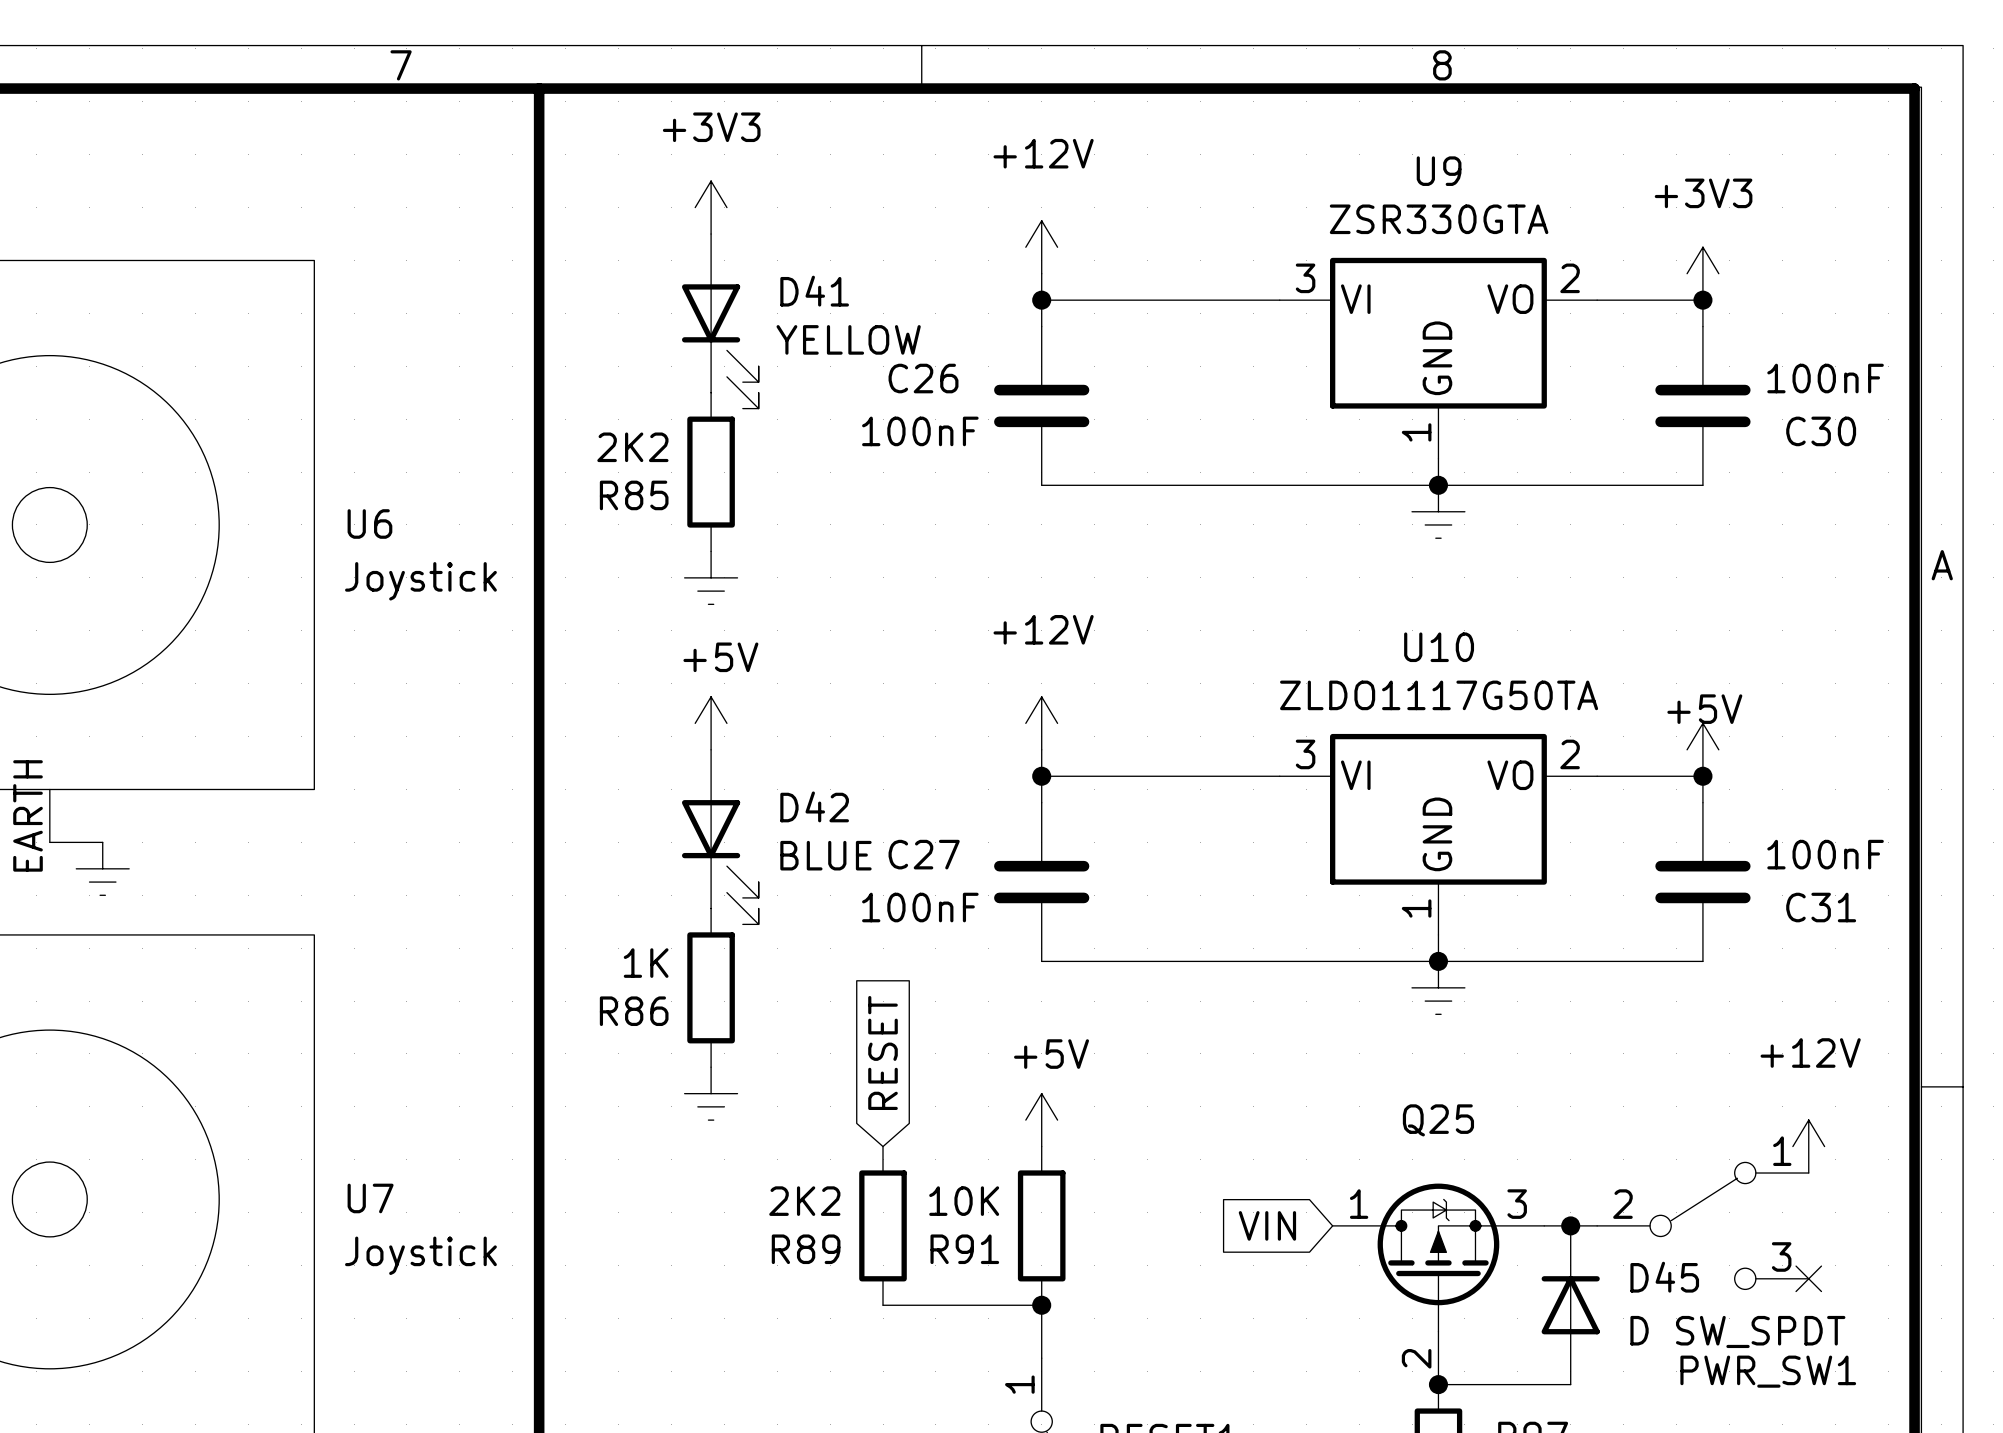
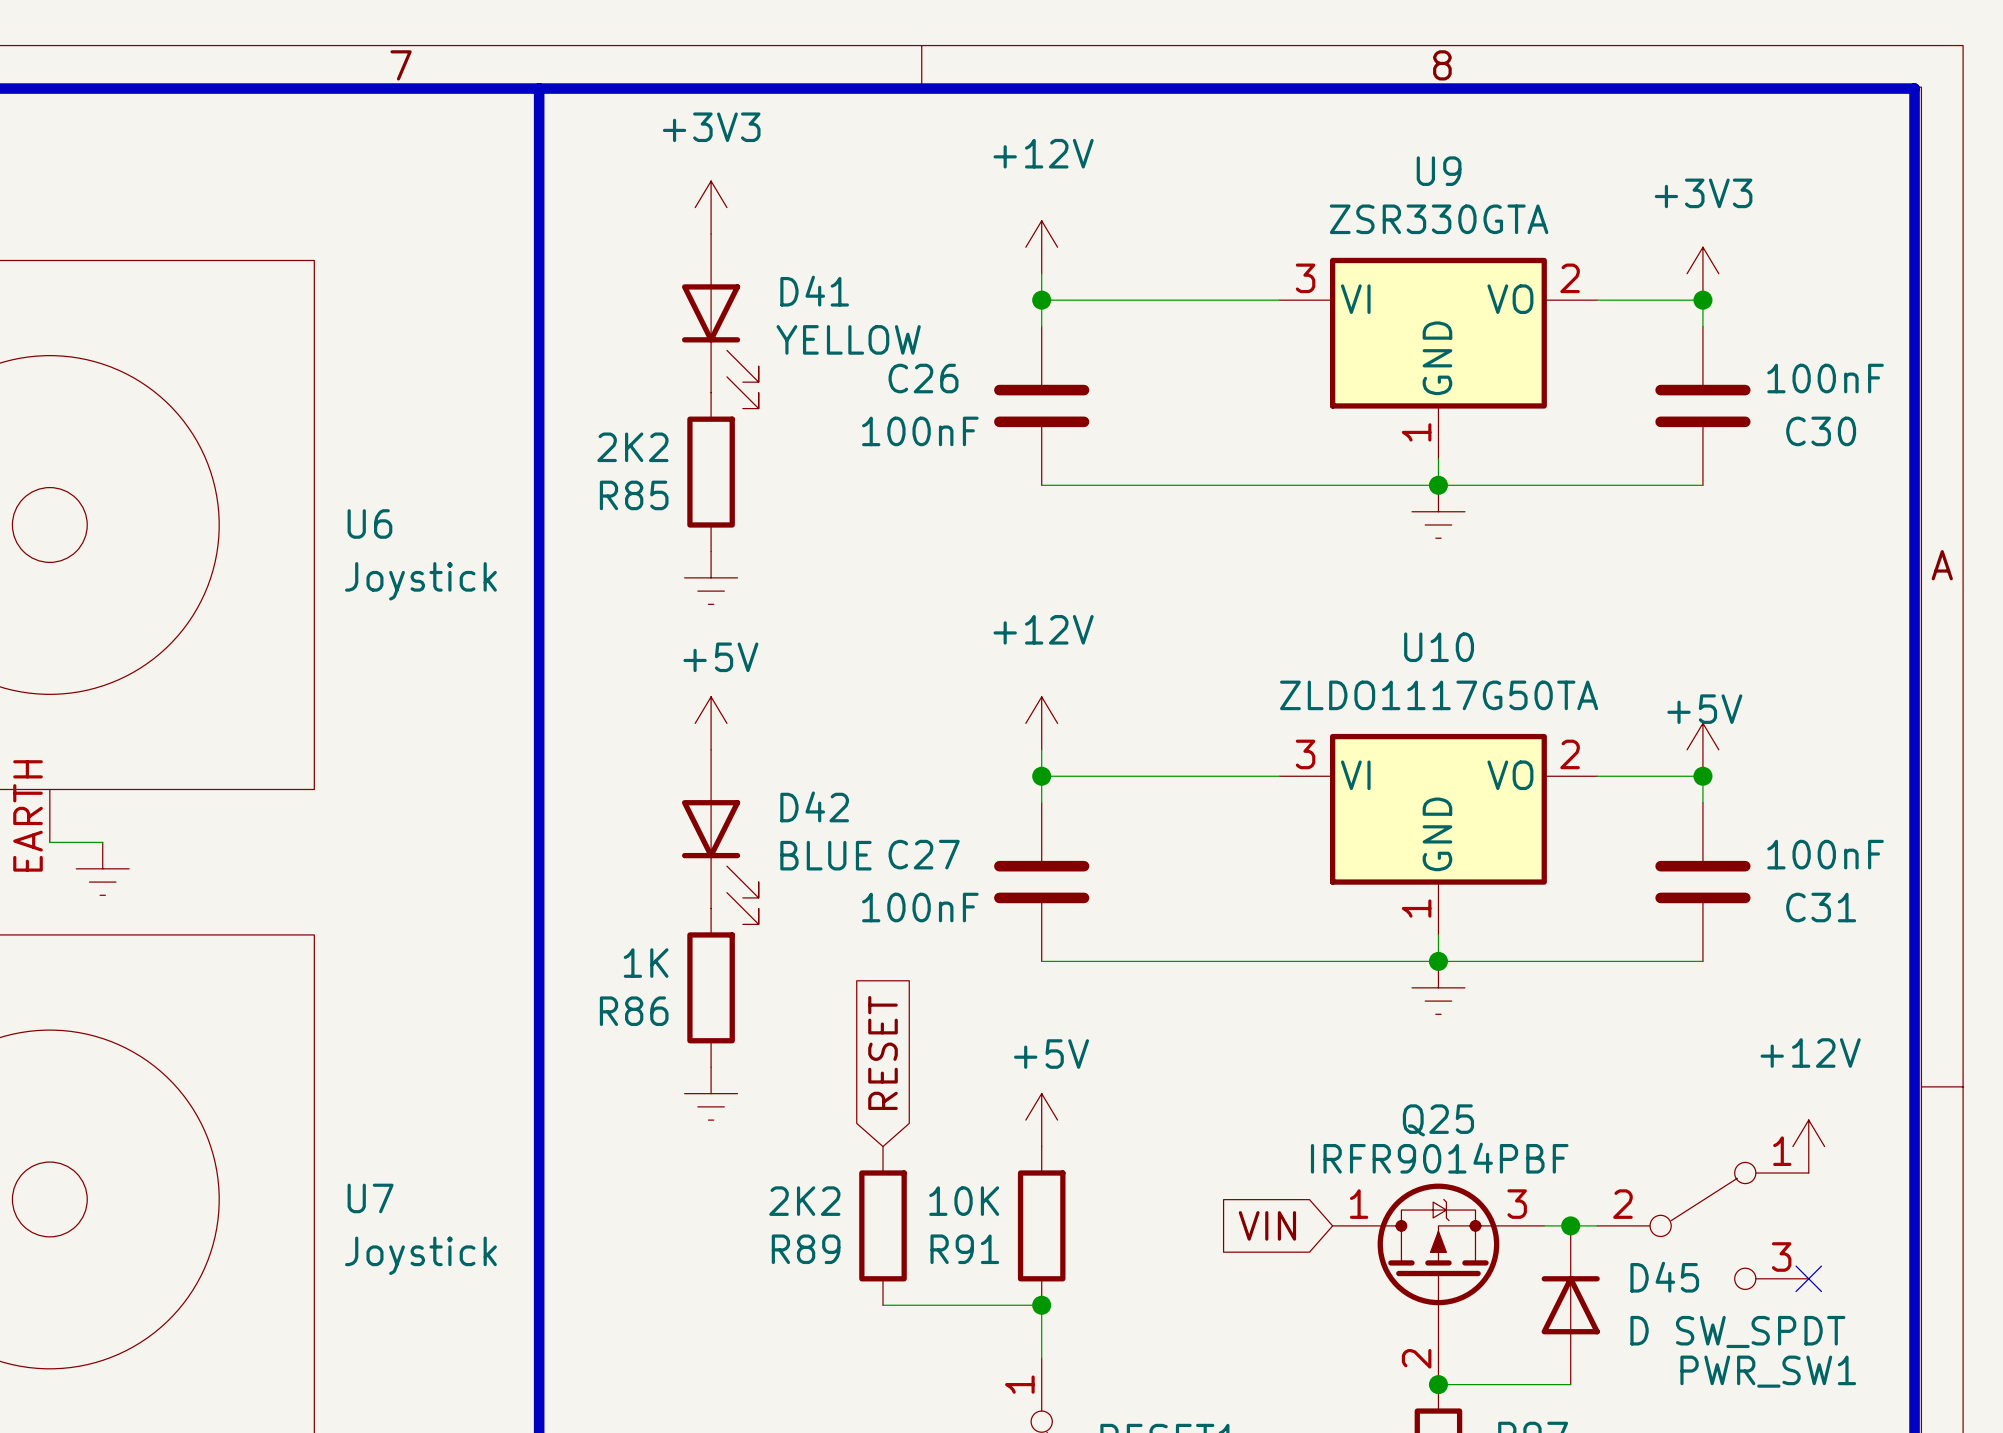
Q25 value: none -> IRFR9014PBF (1439, 1158)

